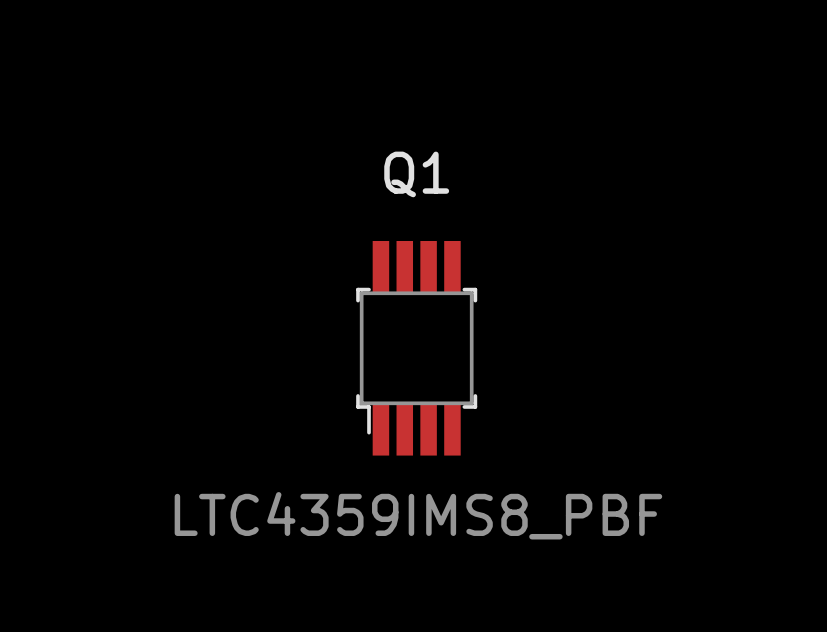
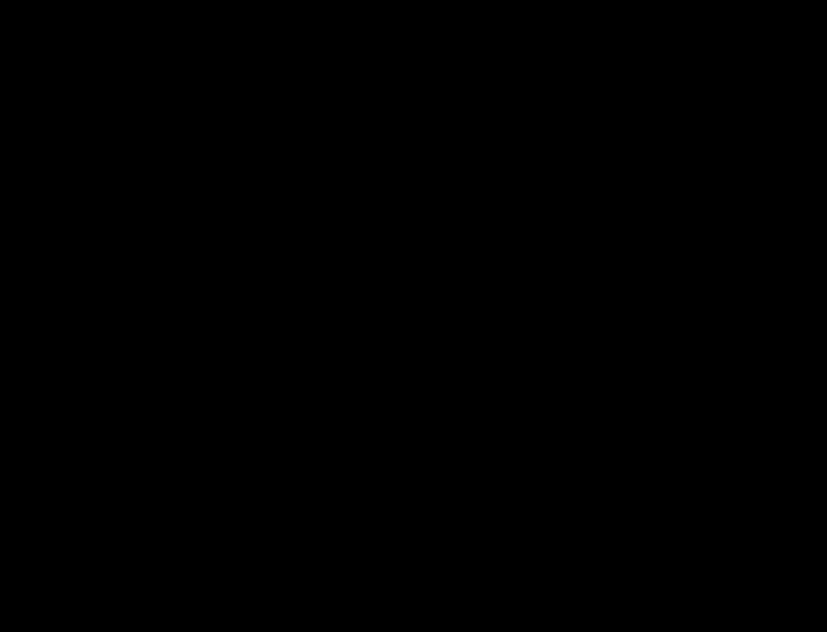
Q1: LTC4359IMS8_PBF (416, 348) -> none

